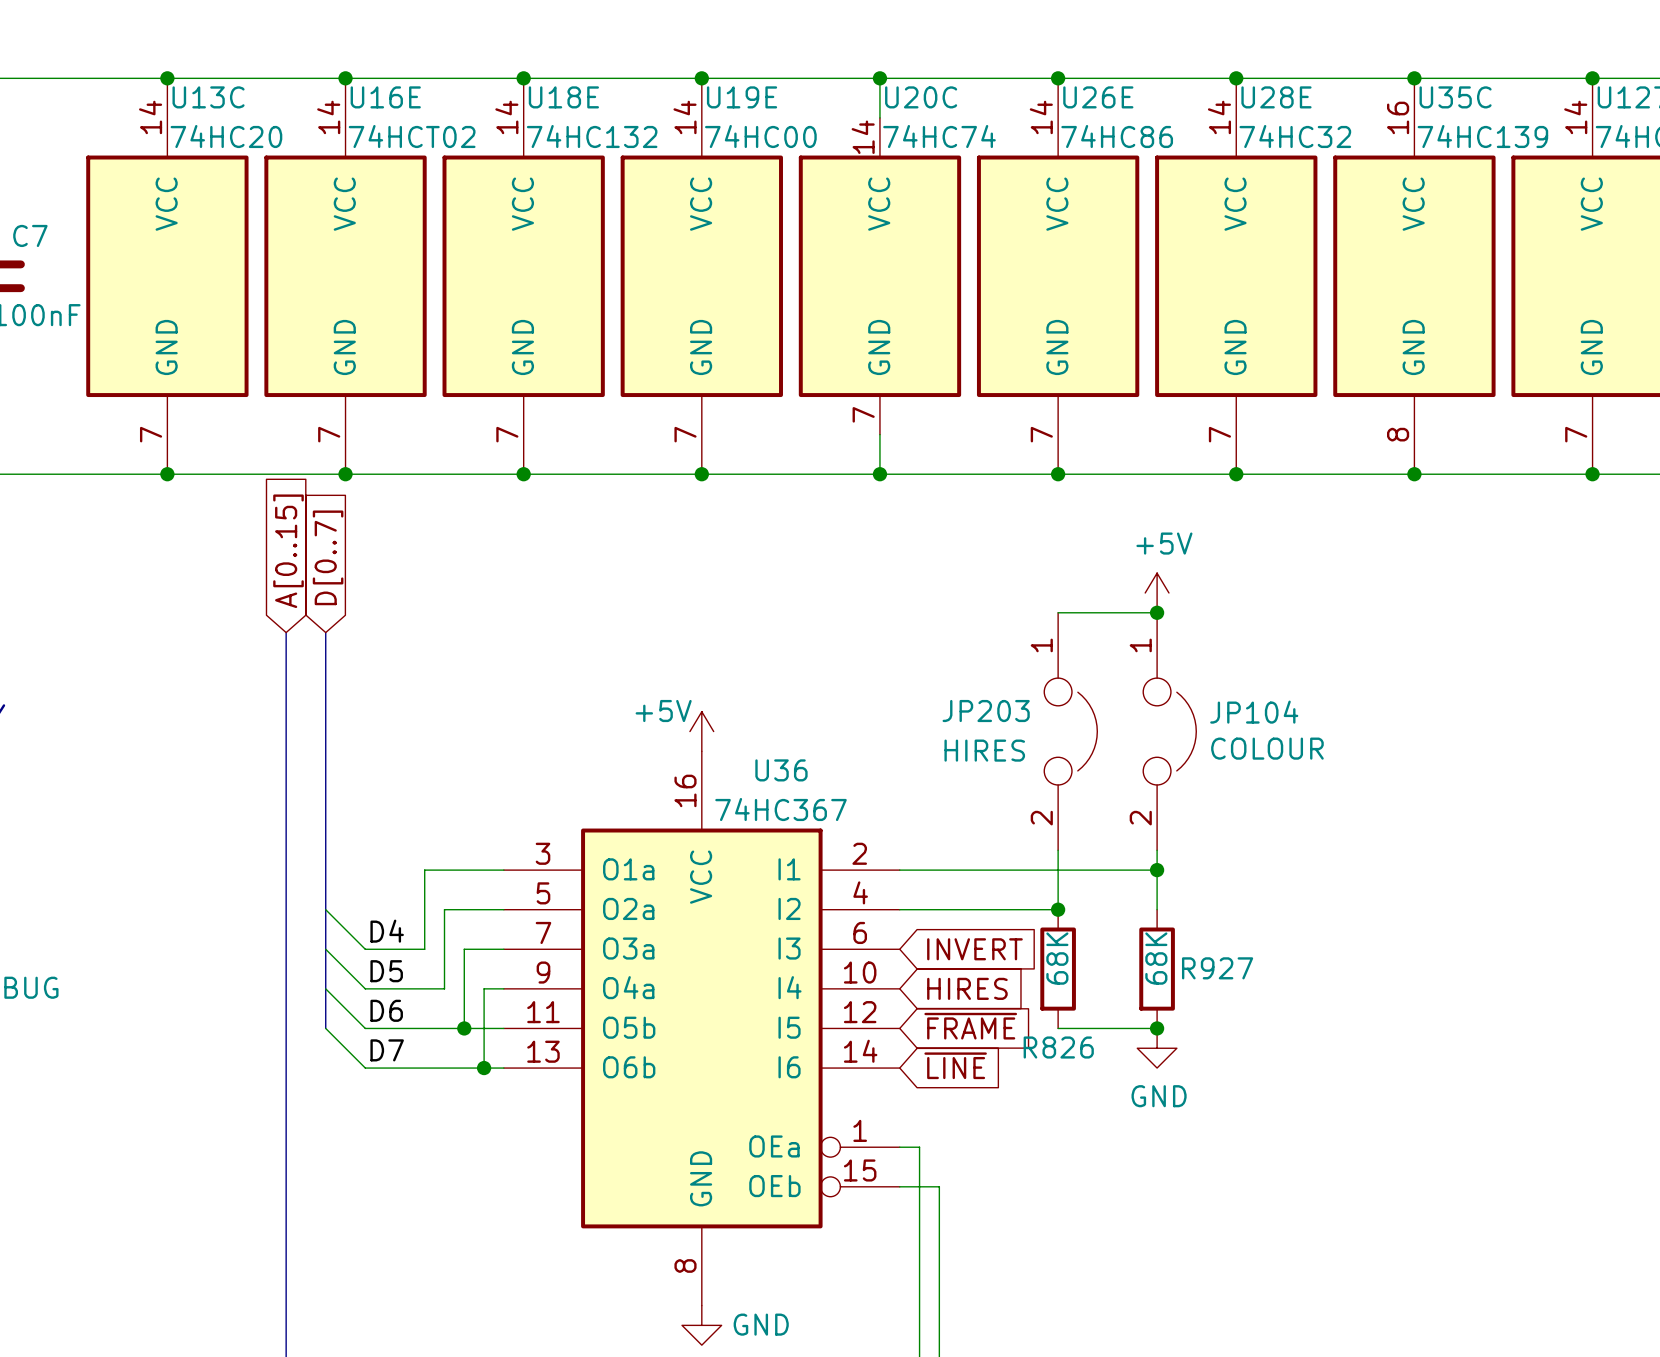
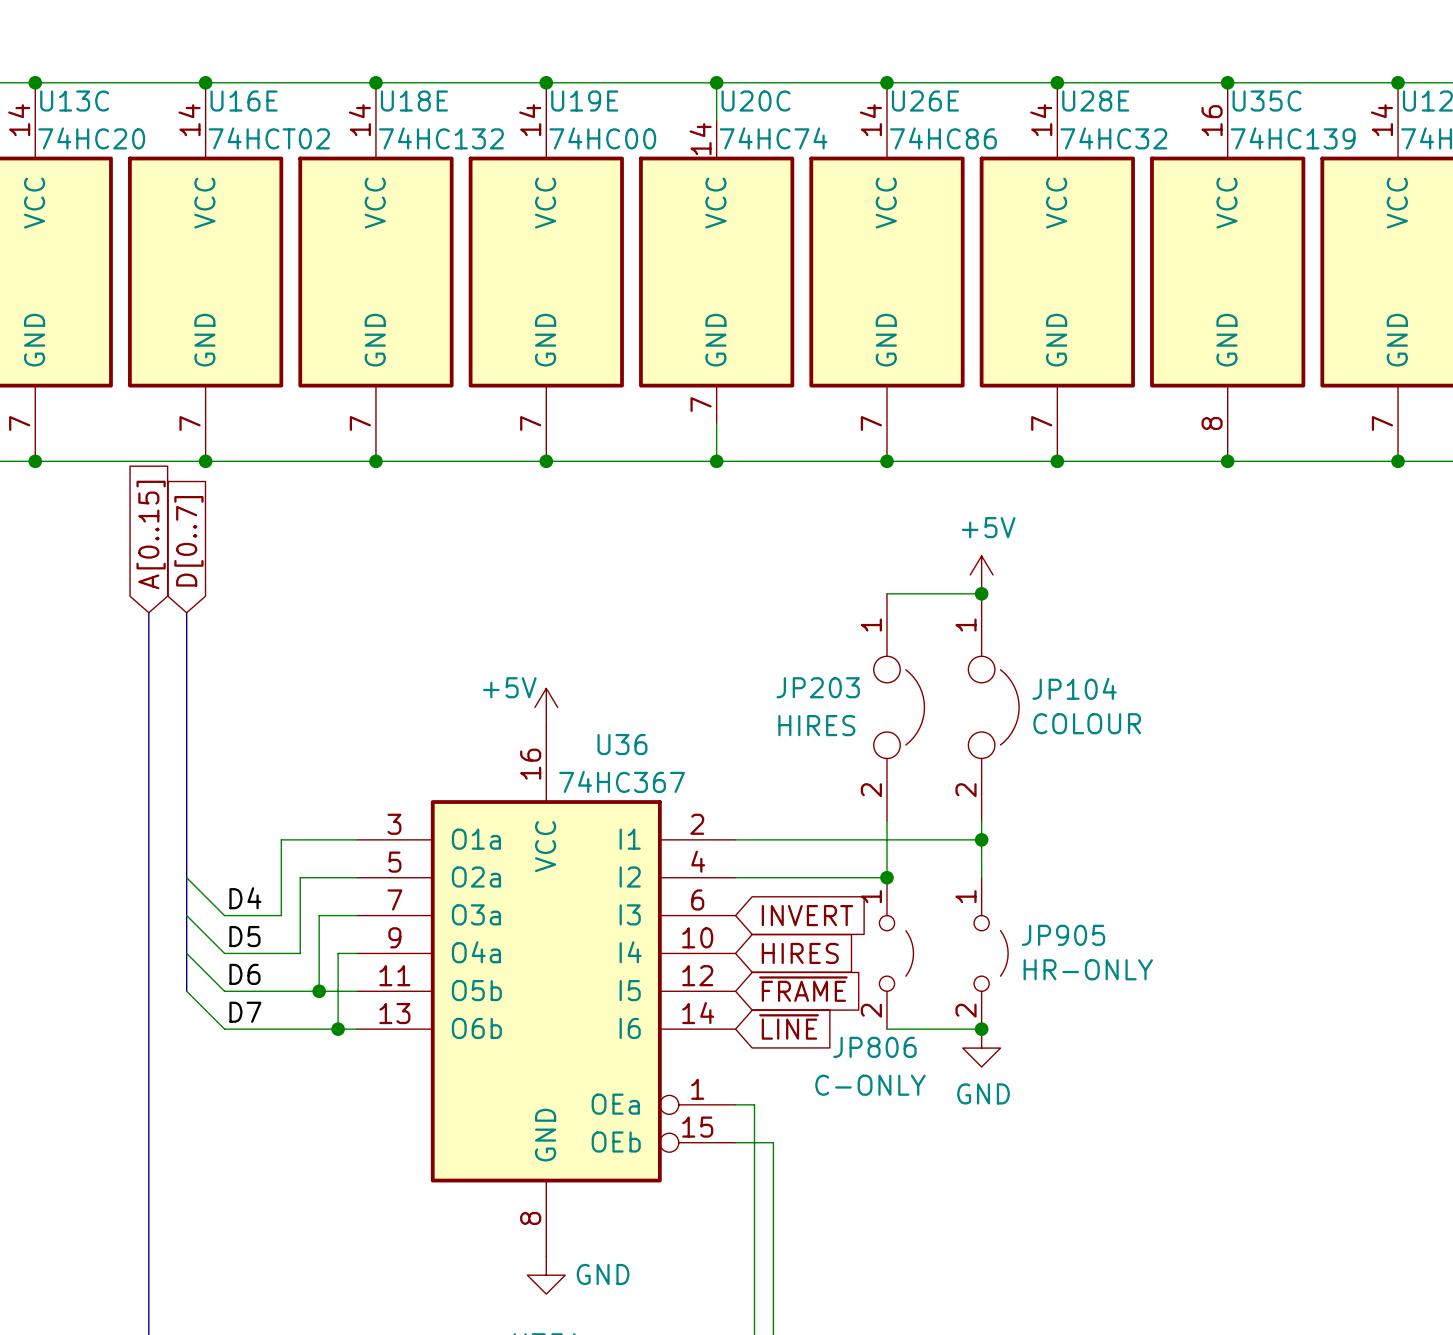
R826: 68K (1058, 969) -> none
R927: 68K (1157, 969) -> none
JP806: none -> C-ONLY (896, 953)
JP905: none -> HR-ONLY (991, 953)
wire: (1058, 1028) (1157, 1028) -> (886, 1029) (981, 1029)
junction position: (1157, 1028) -> (981, 1029)
power symbol position: GND (1157, 1048) -> GND (981, 1048)

